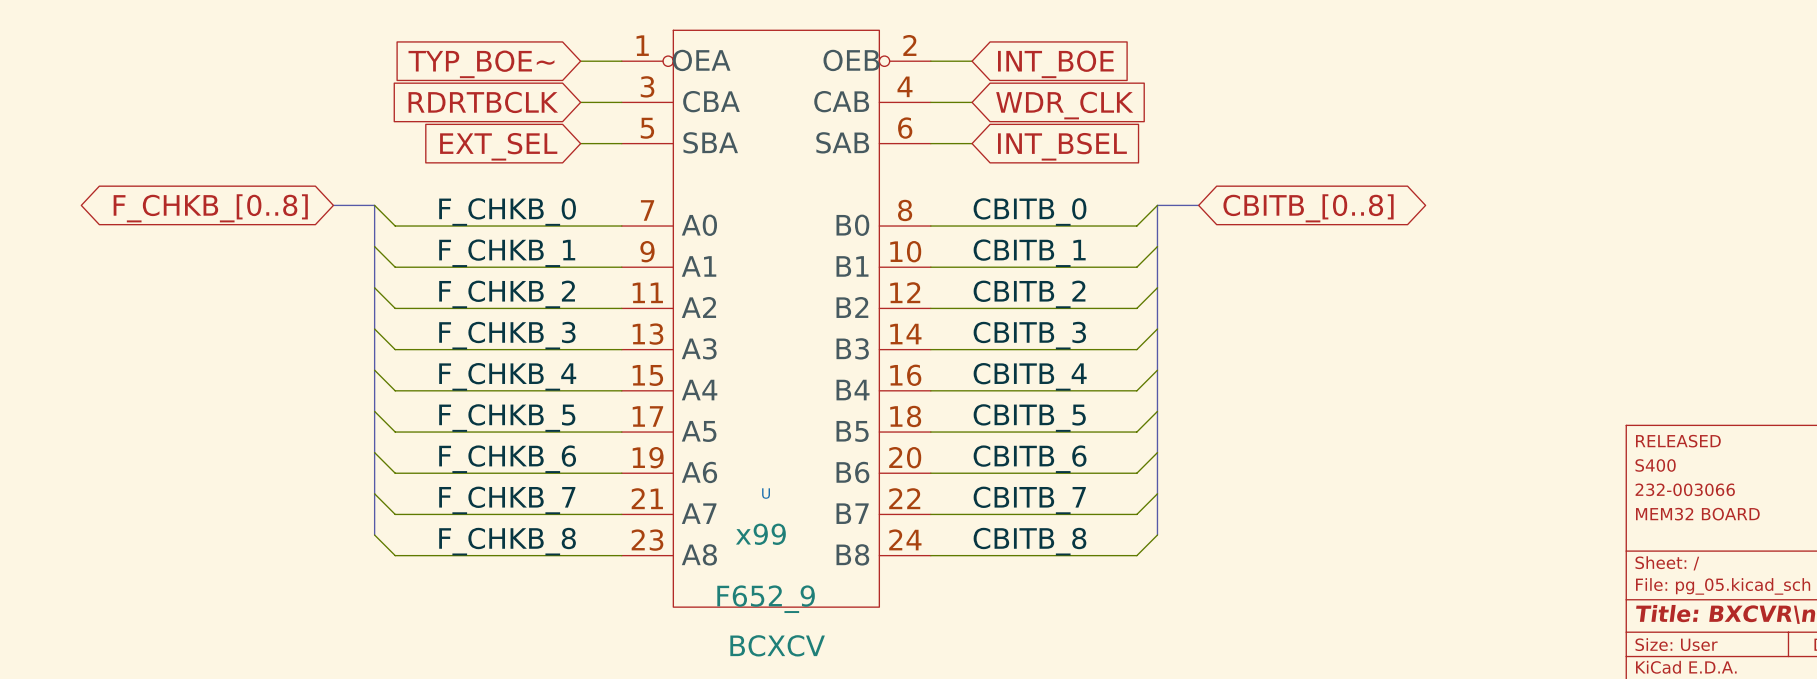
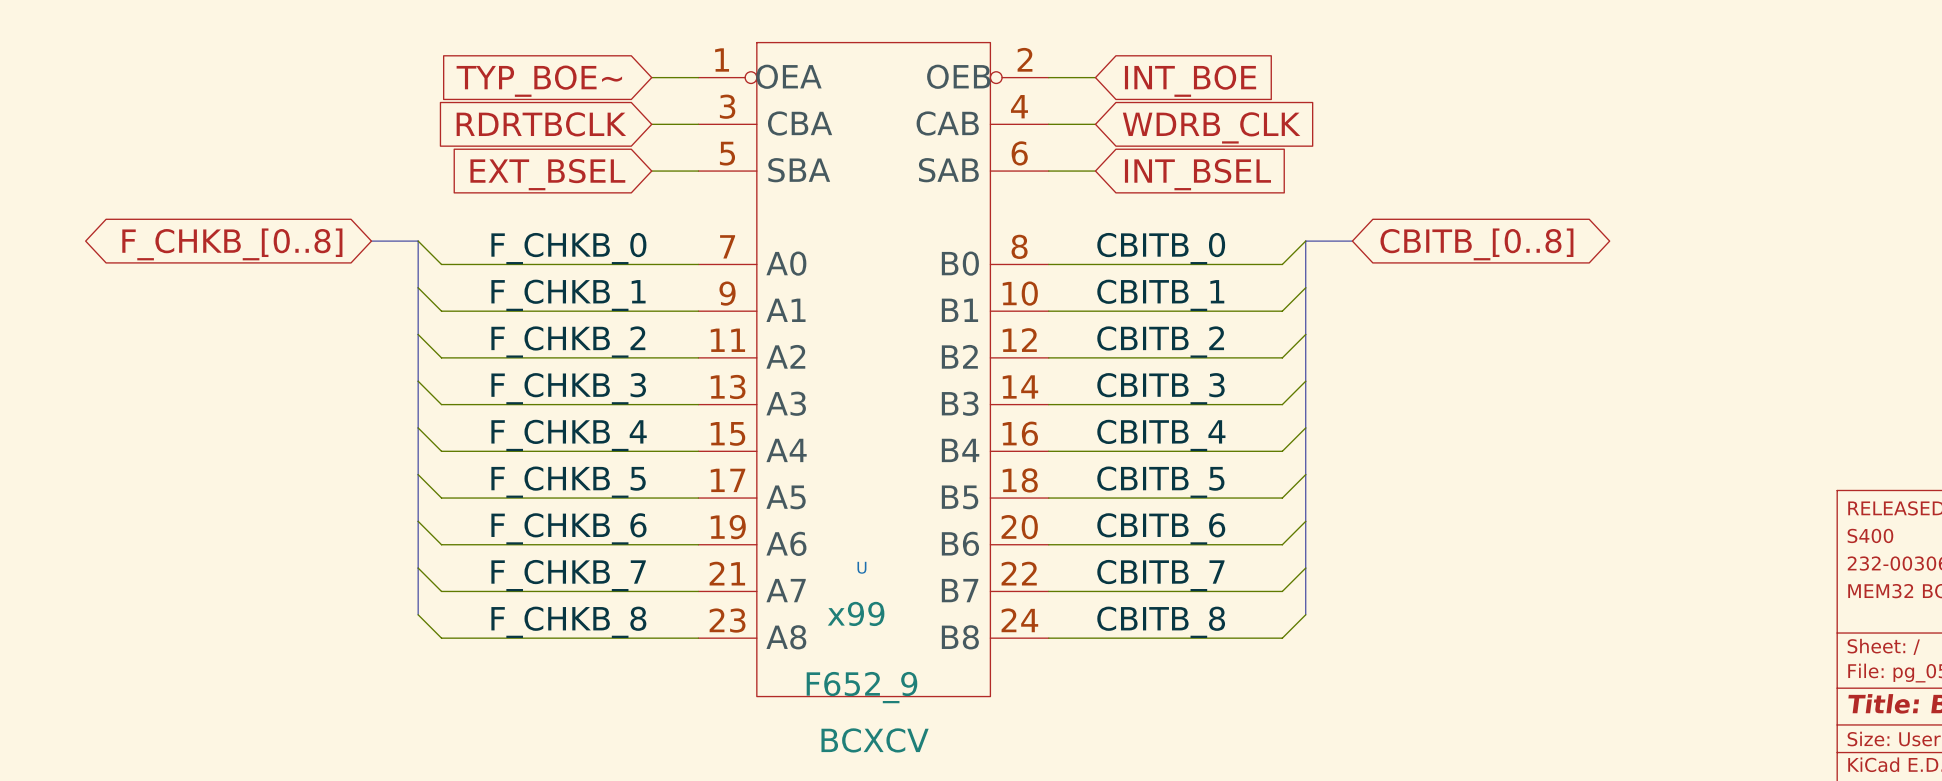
global label: WDR_CLK (1064, 105) -> WDRB_CLK (1211, 127)
global label: EXT_SEL (498, 146) -> EXT_BSEL (547, 174)

